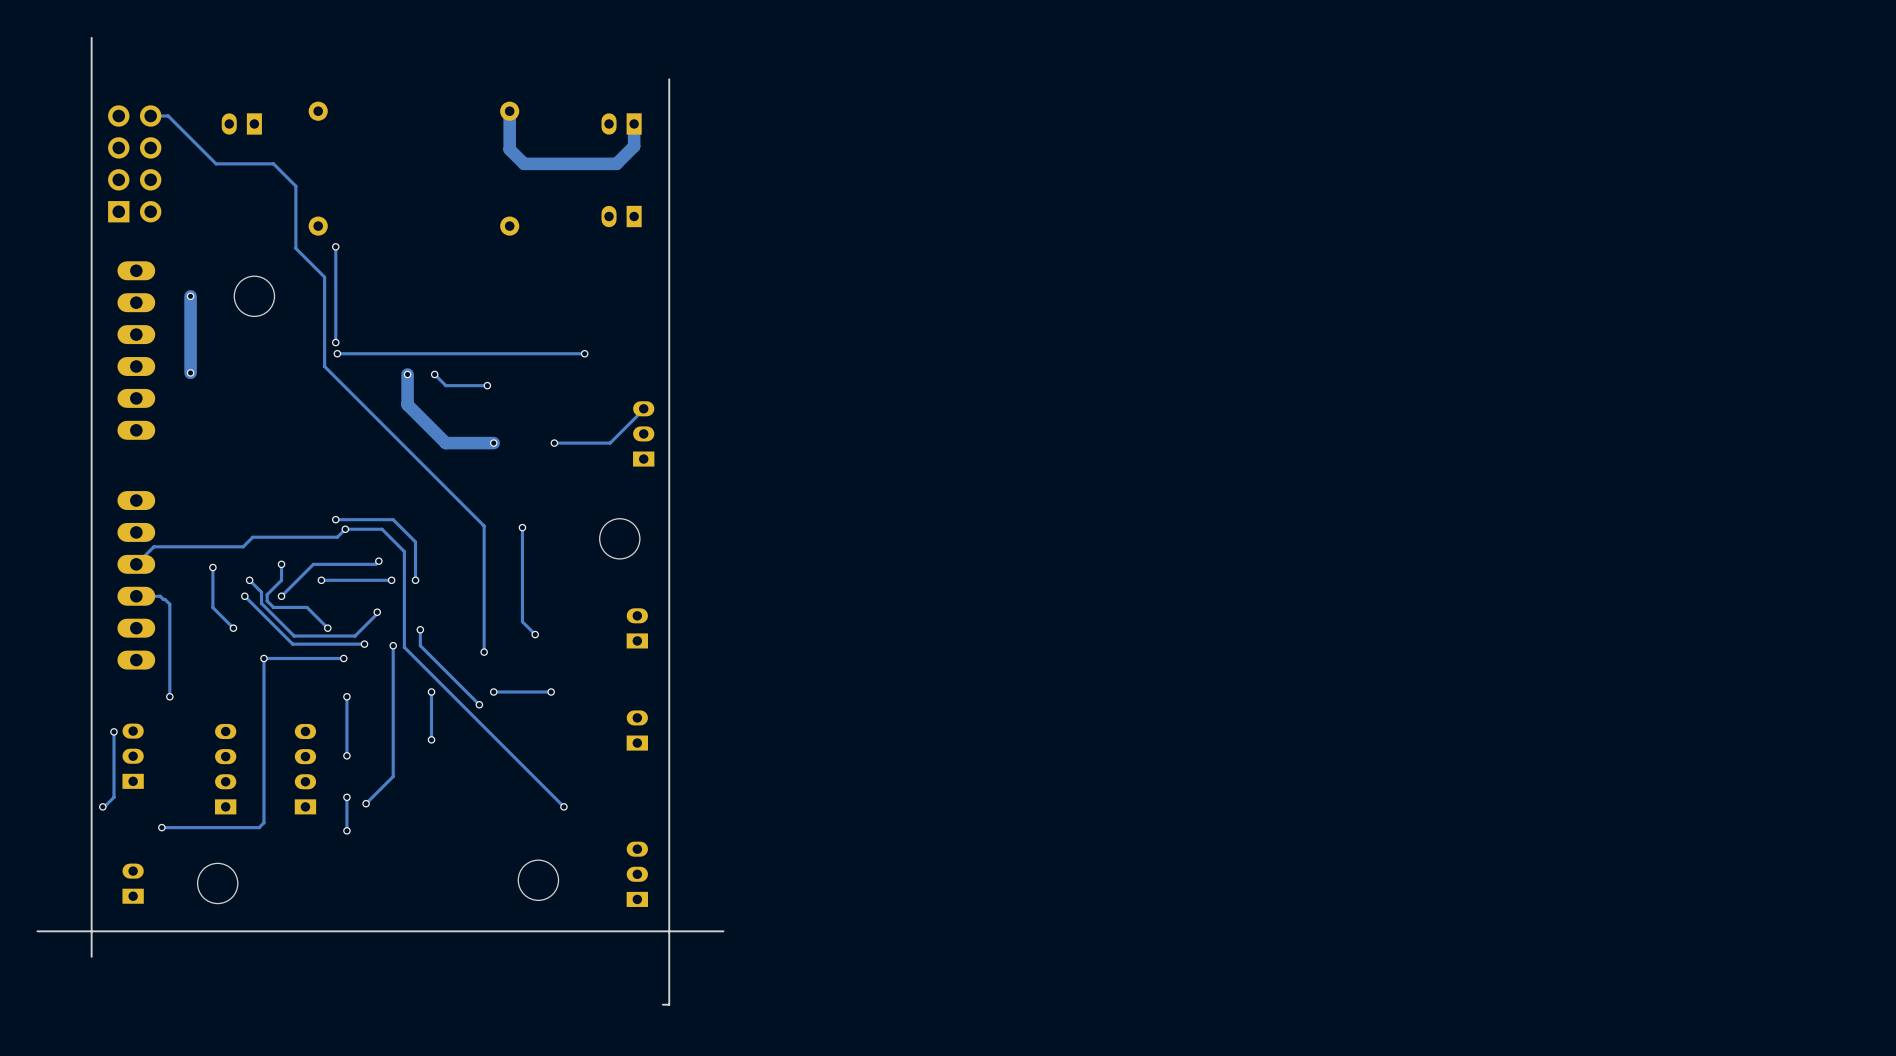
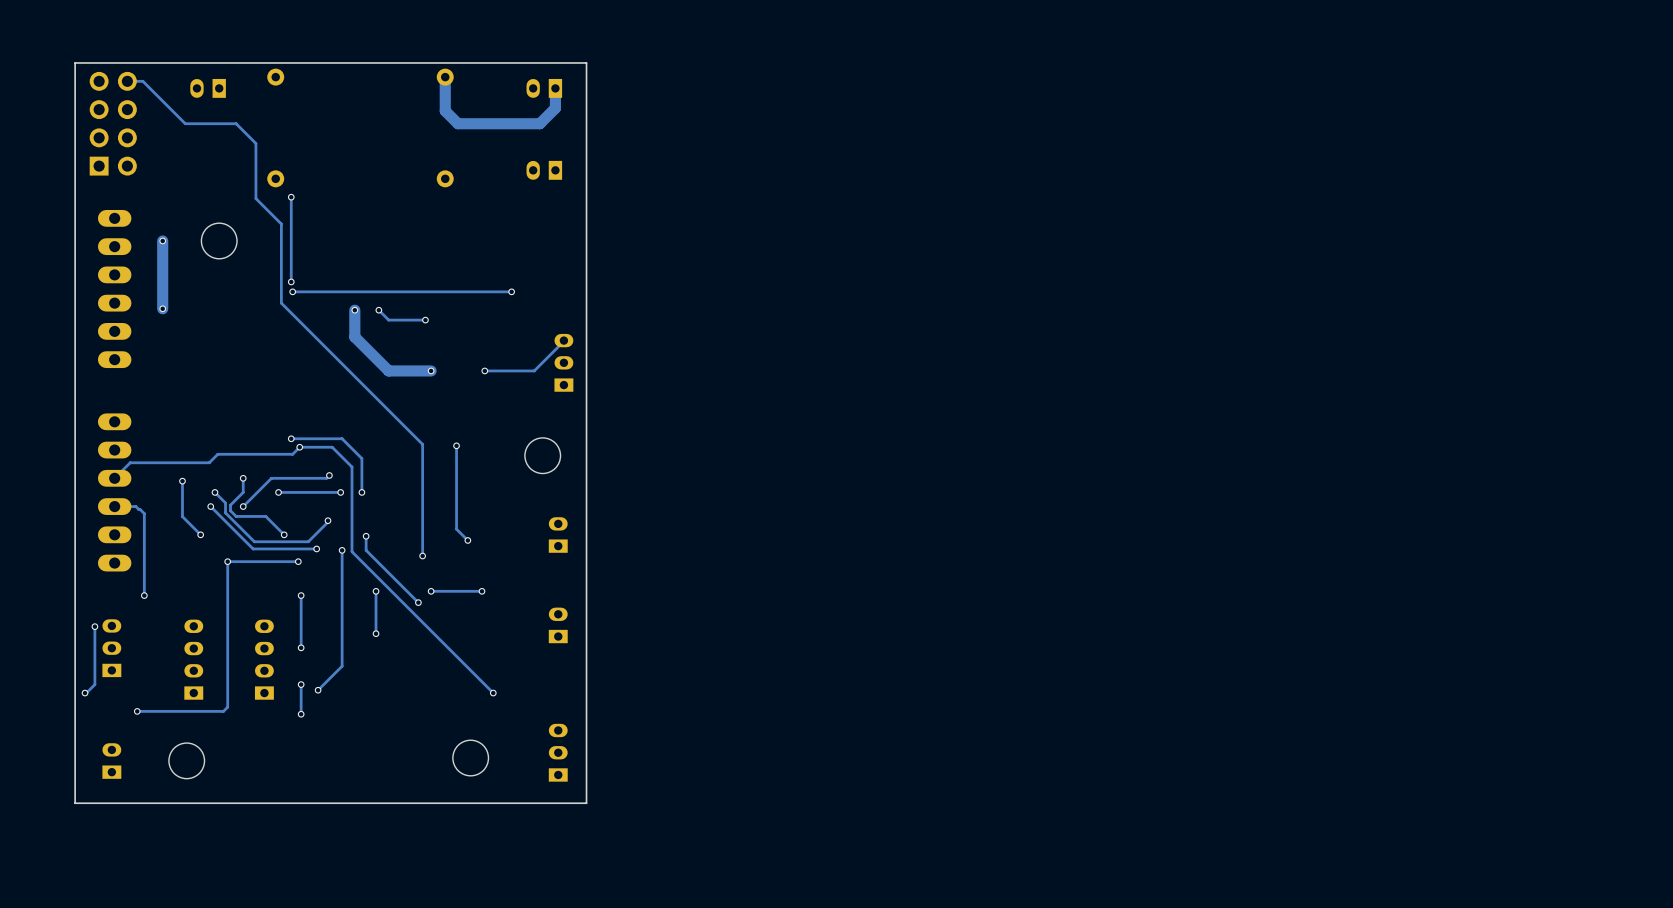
board edge: (91, 37) (91, 95) -> none
board edge: (669, 79) (669, 95) -> (75, 62) (586, 62)
board edge: (37, 931) (91, 931) (91, 956) -> none
board edge: (723, 931) (669, 931) (669, 1004) (662, 1004) -> none

